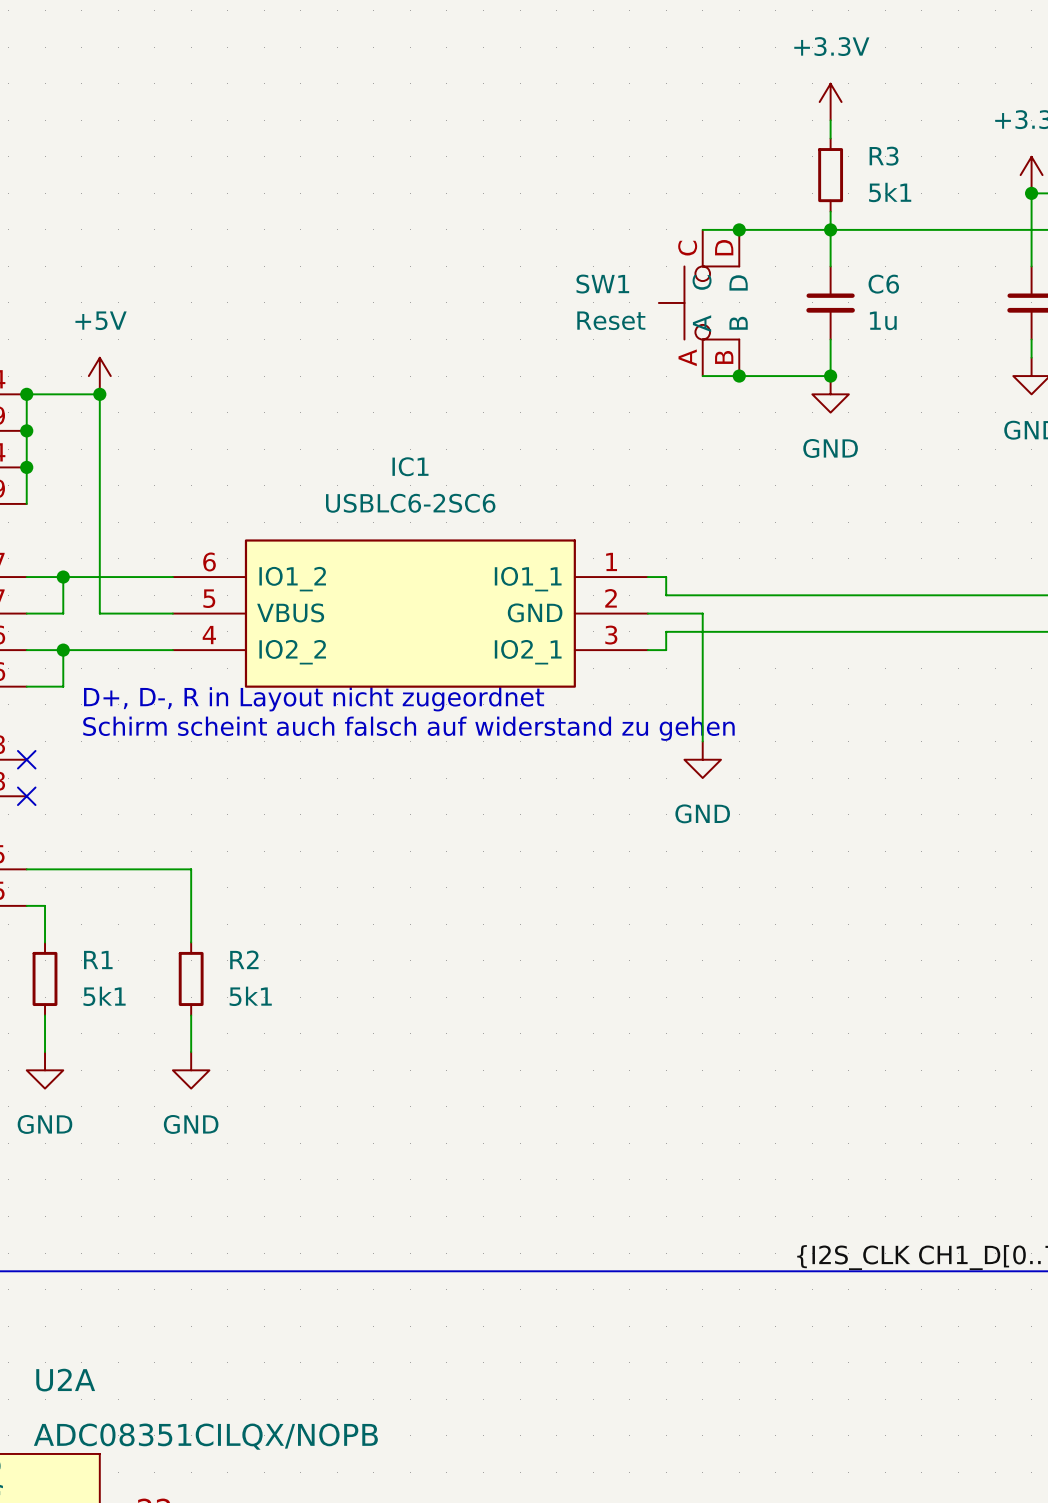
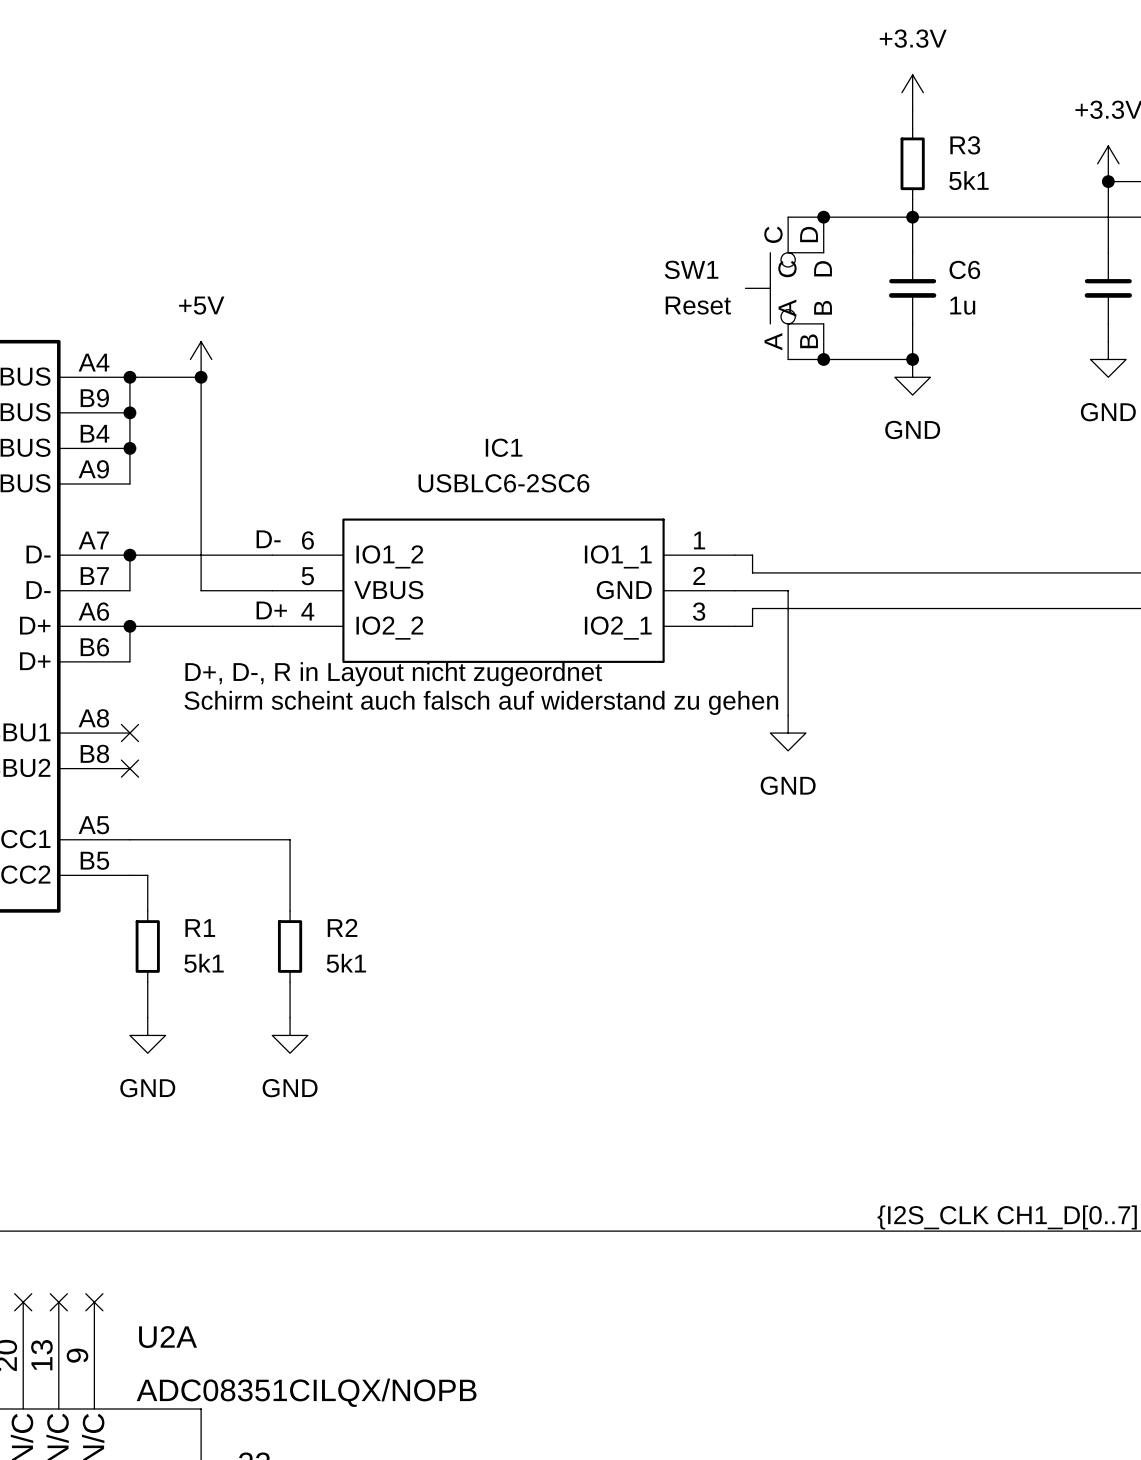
label: none -> D- (268, 539)
wire: (63, 577) (63, 613) (26, 613) -> (129, 555) (129, 590)
junction position: (63, 577) -> (129, 555)
label: none -> D+ (271, 610)
wire: (63, 650) (63, 686) (26, 686) -> (129, 626) (129, 661)
junction position: (63, 650) -> (129, 626)

